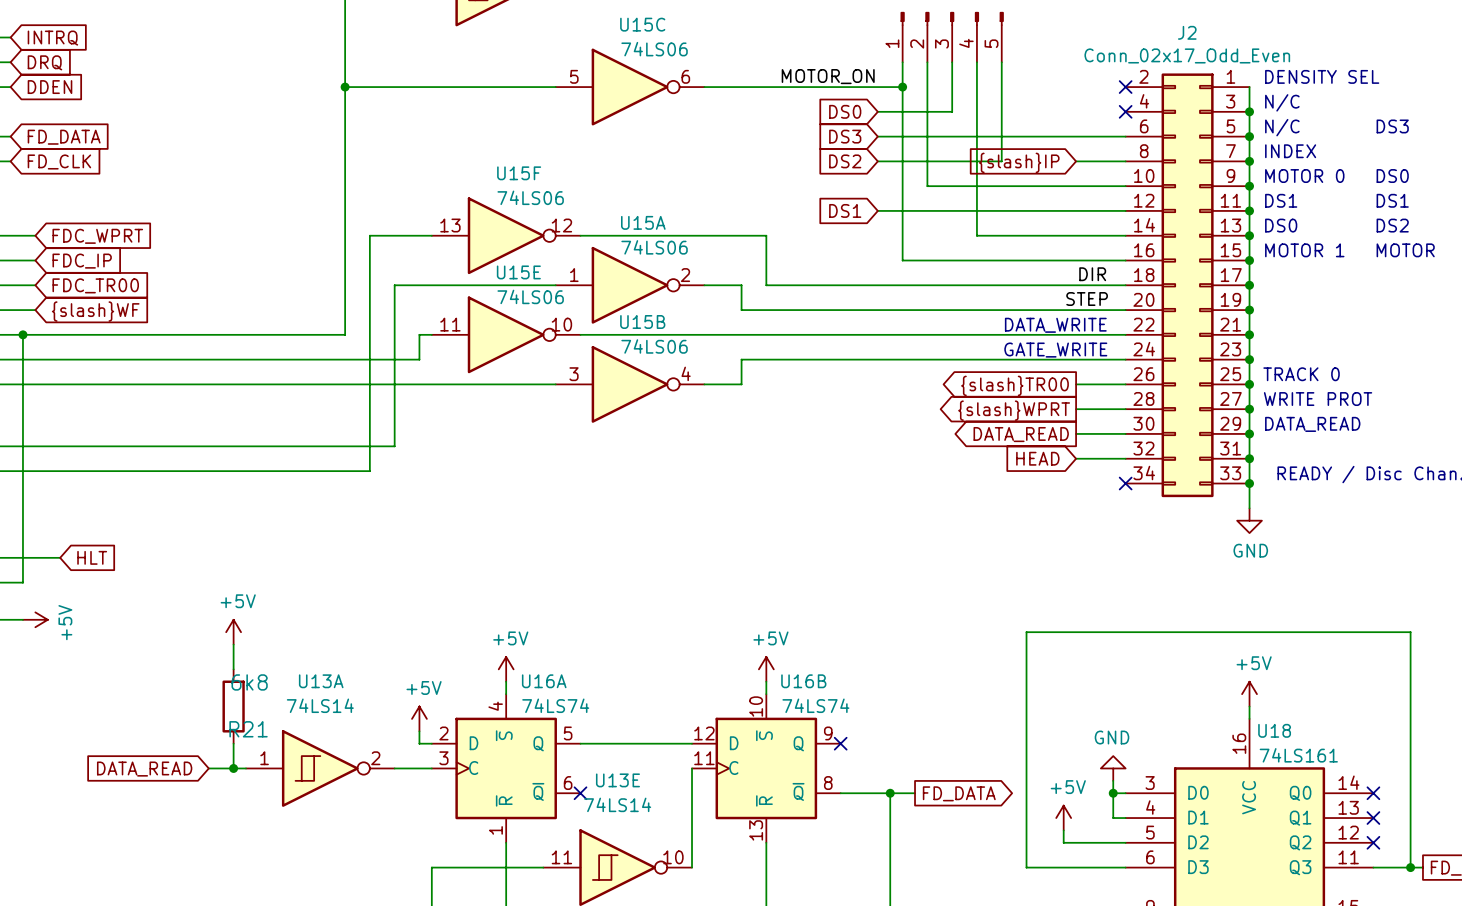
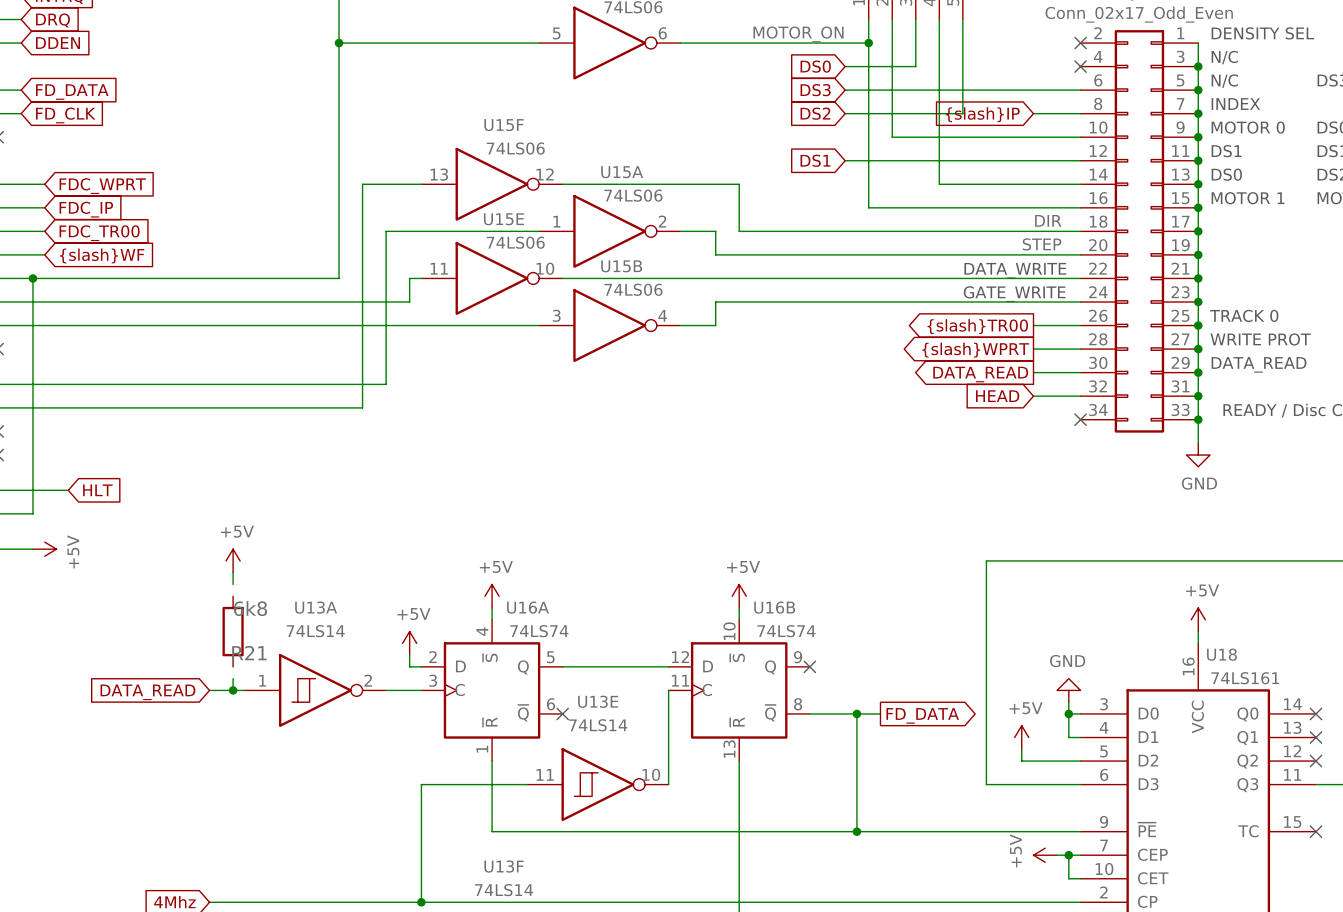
wire: (233, 656) (233, 669) -> none
wire: (233, 743) (233, 756) -> none

